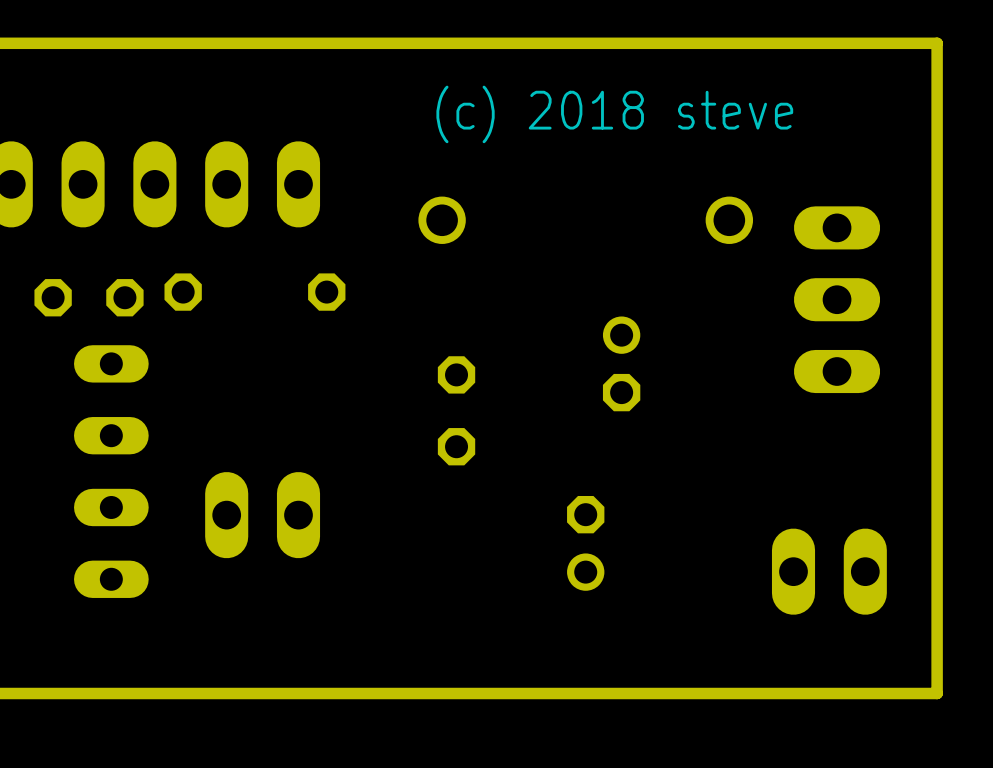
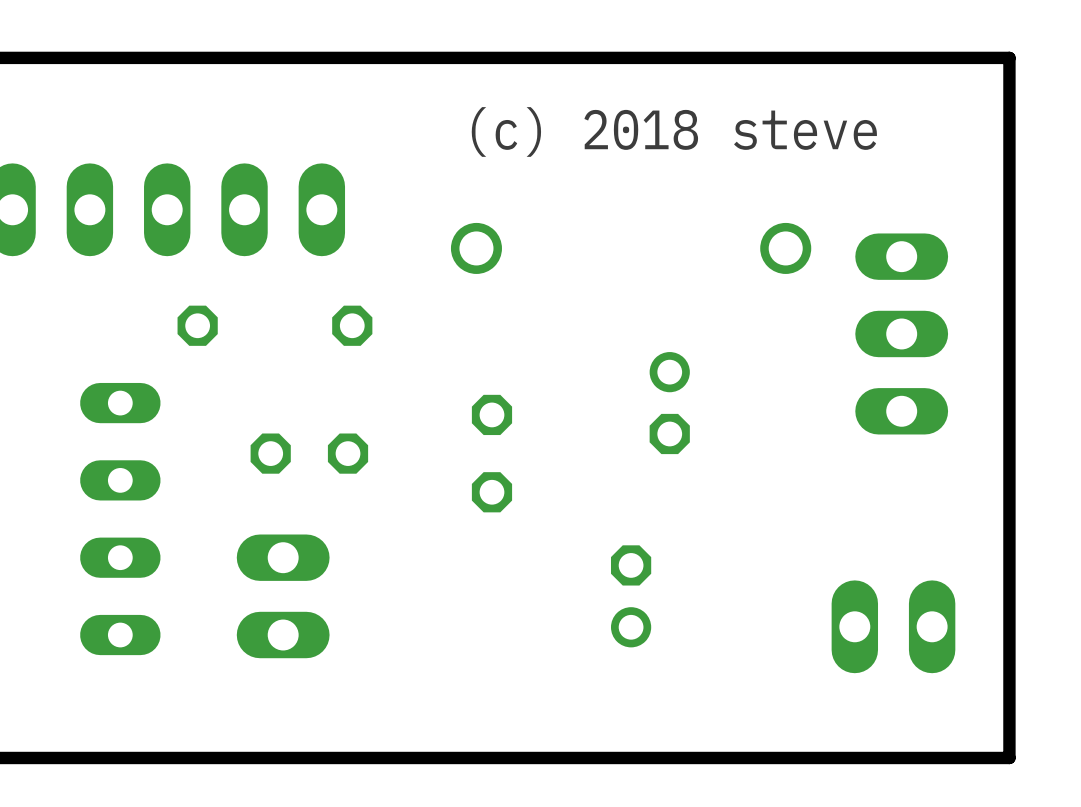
part position: (89, 297) -> (309, 453)
part rotation: 0° (262, 515) -> 90° clockwise (283, 596)

